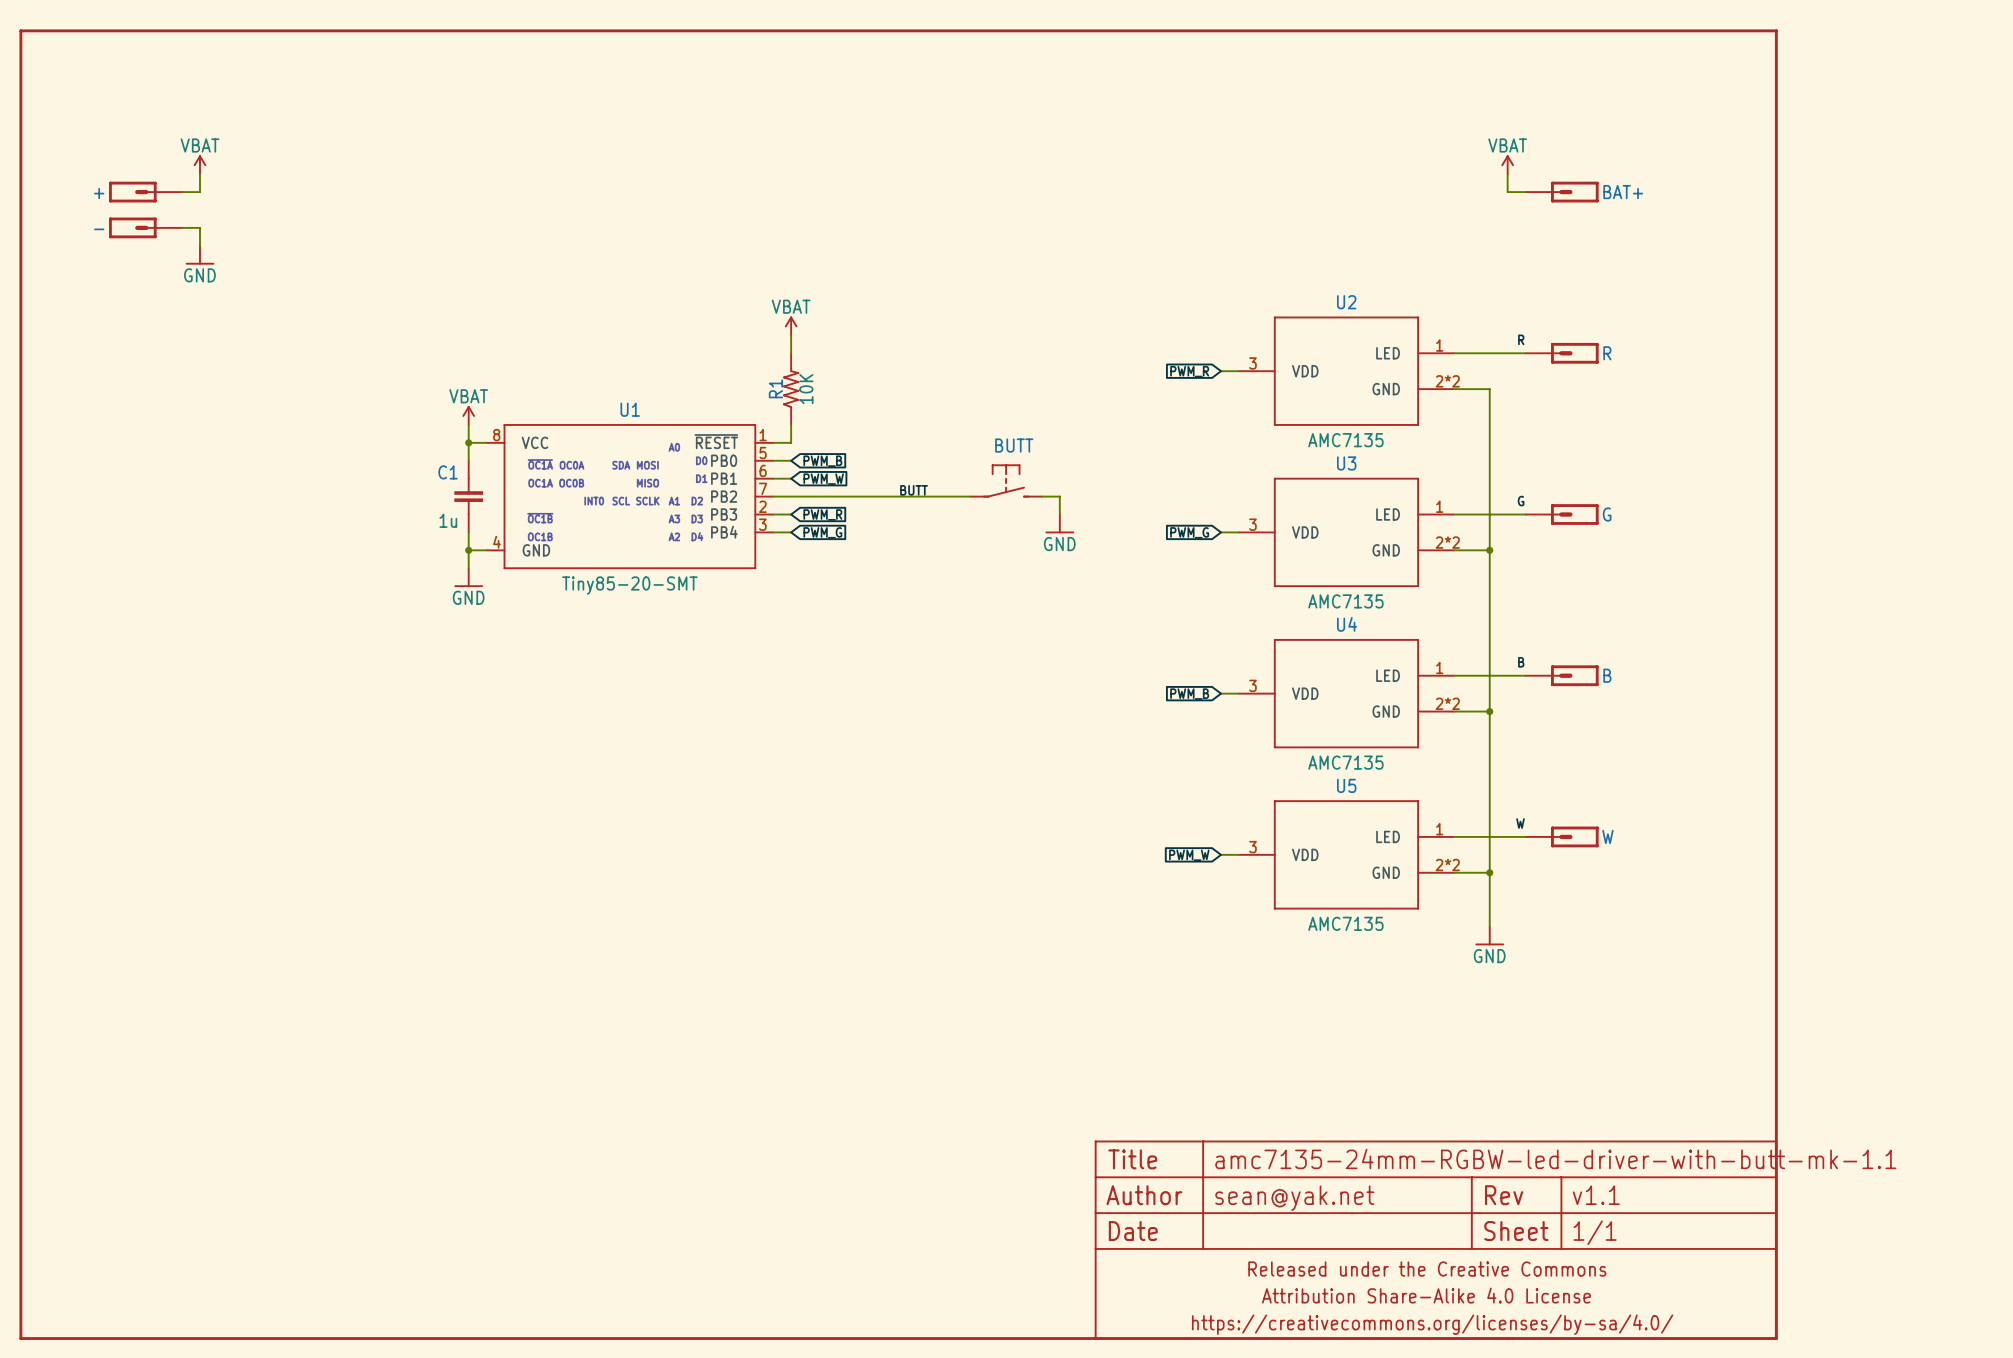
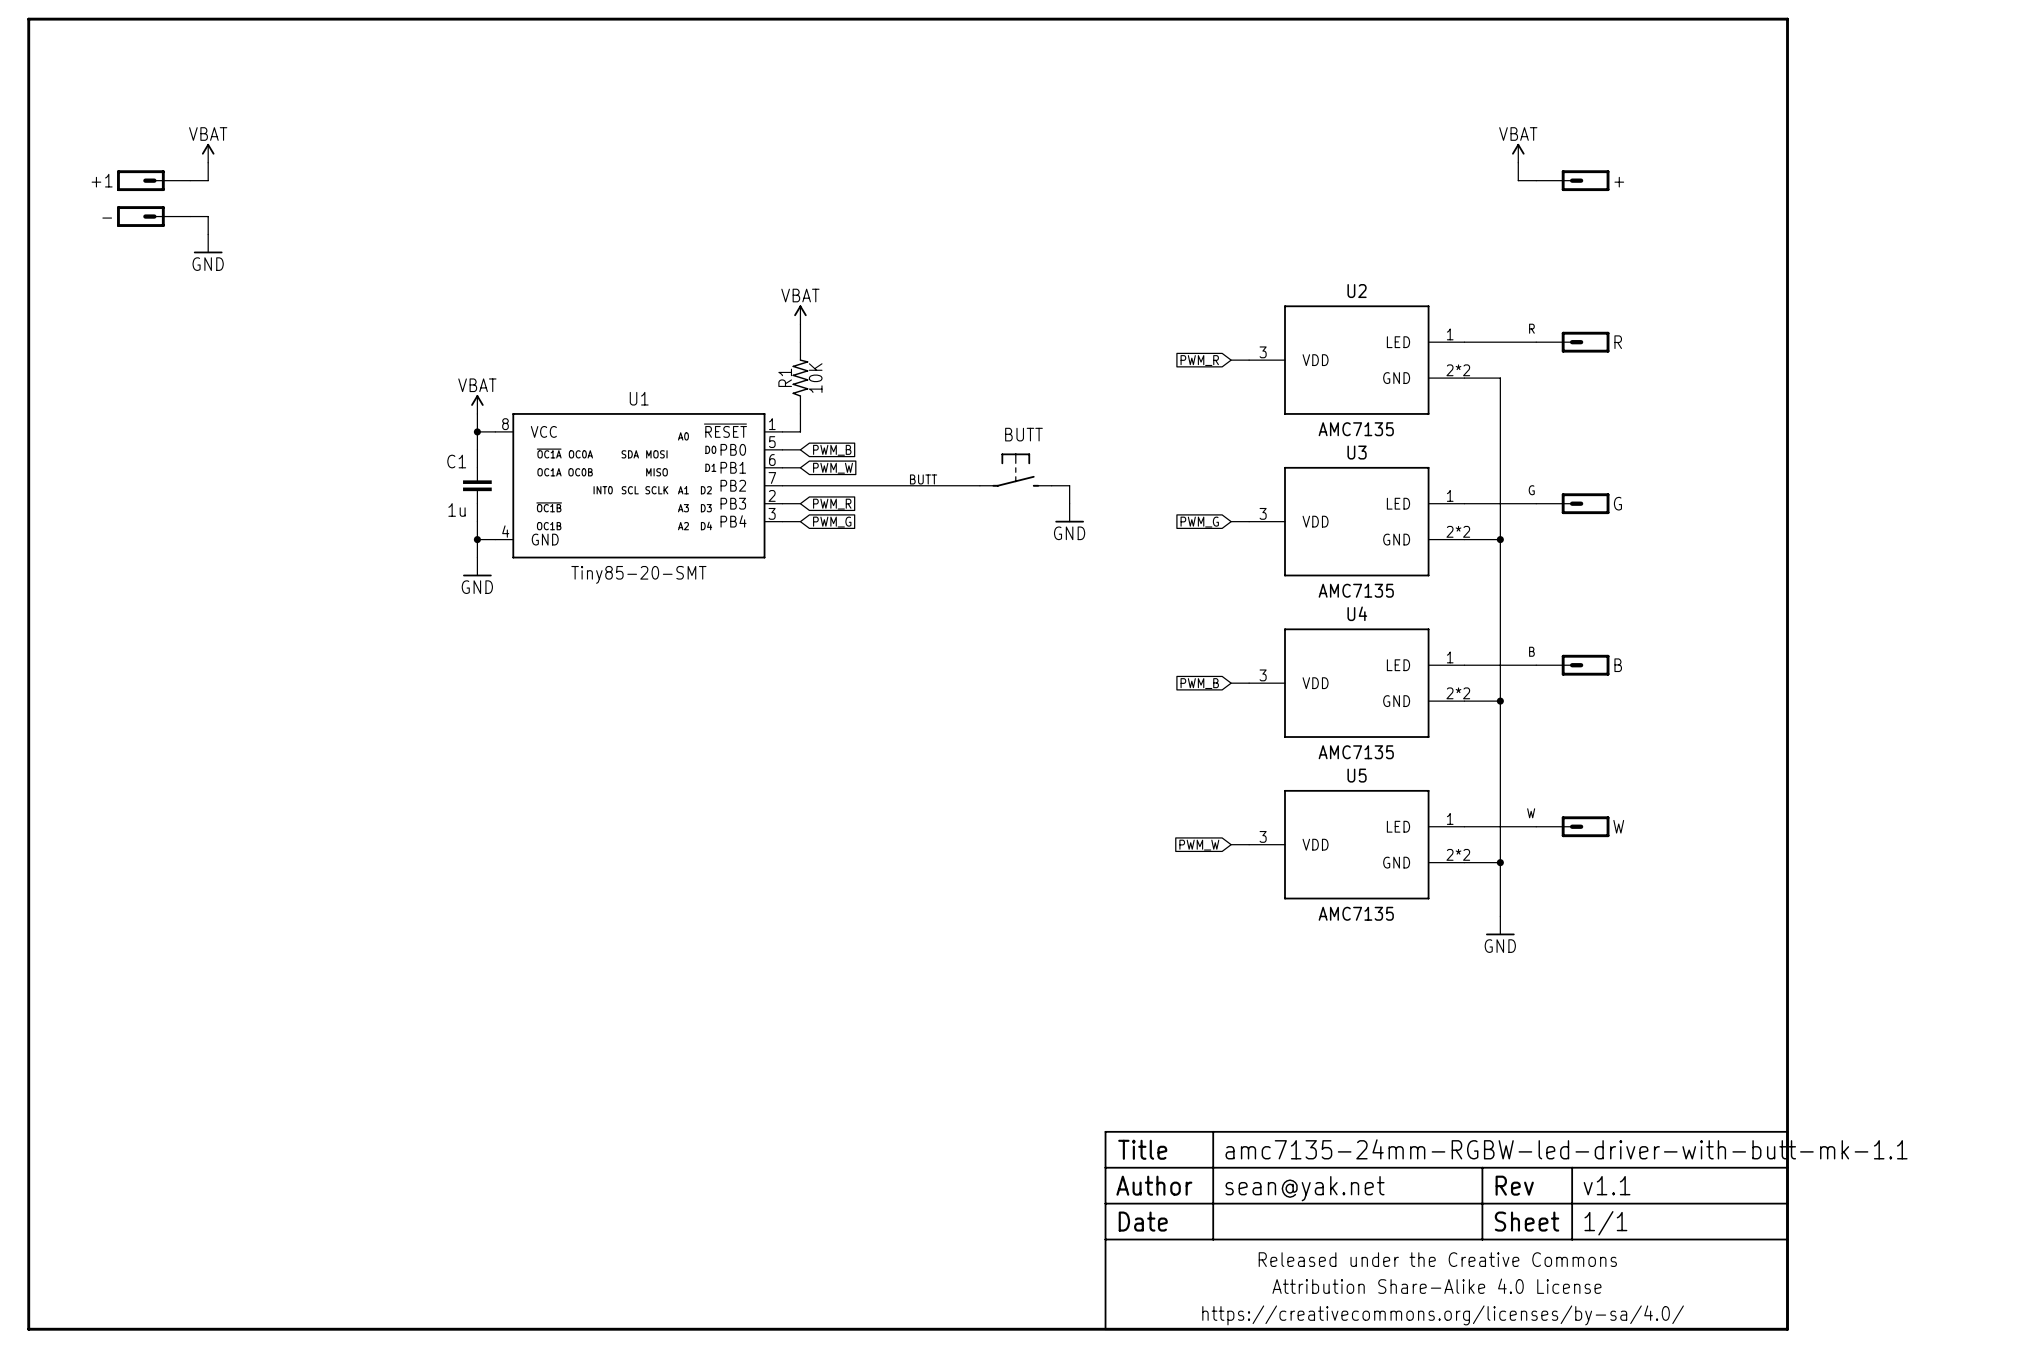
BAT+ name: BAT+ (1623, 192) -> + (1619, 182)
+1 name: + (99, 193) -> +1 (102, 180)

